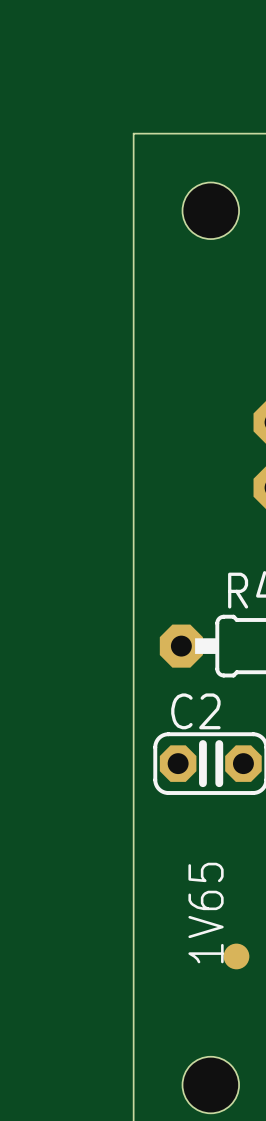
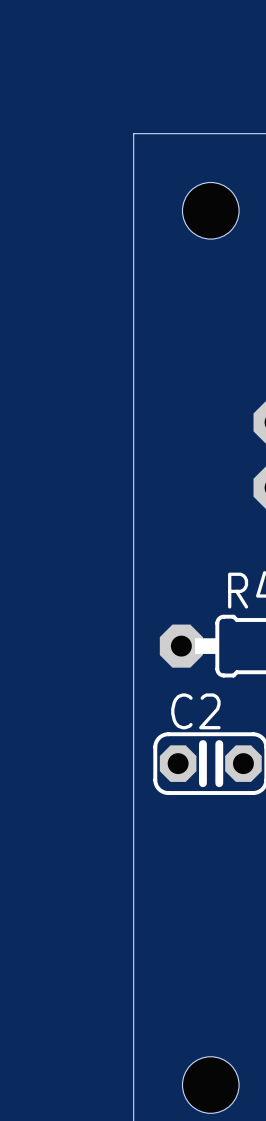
1V65: (236, 956) -> none

